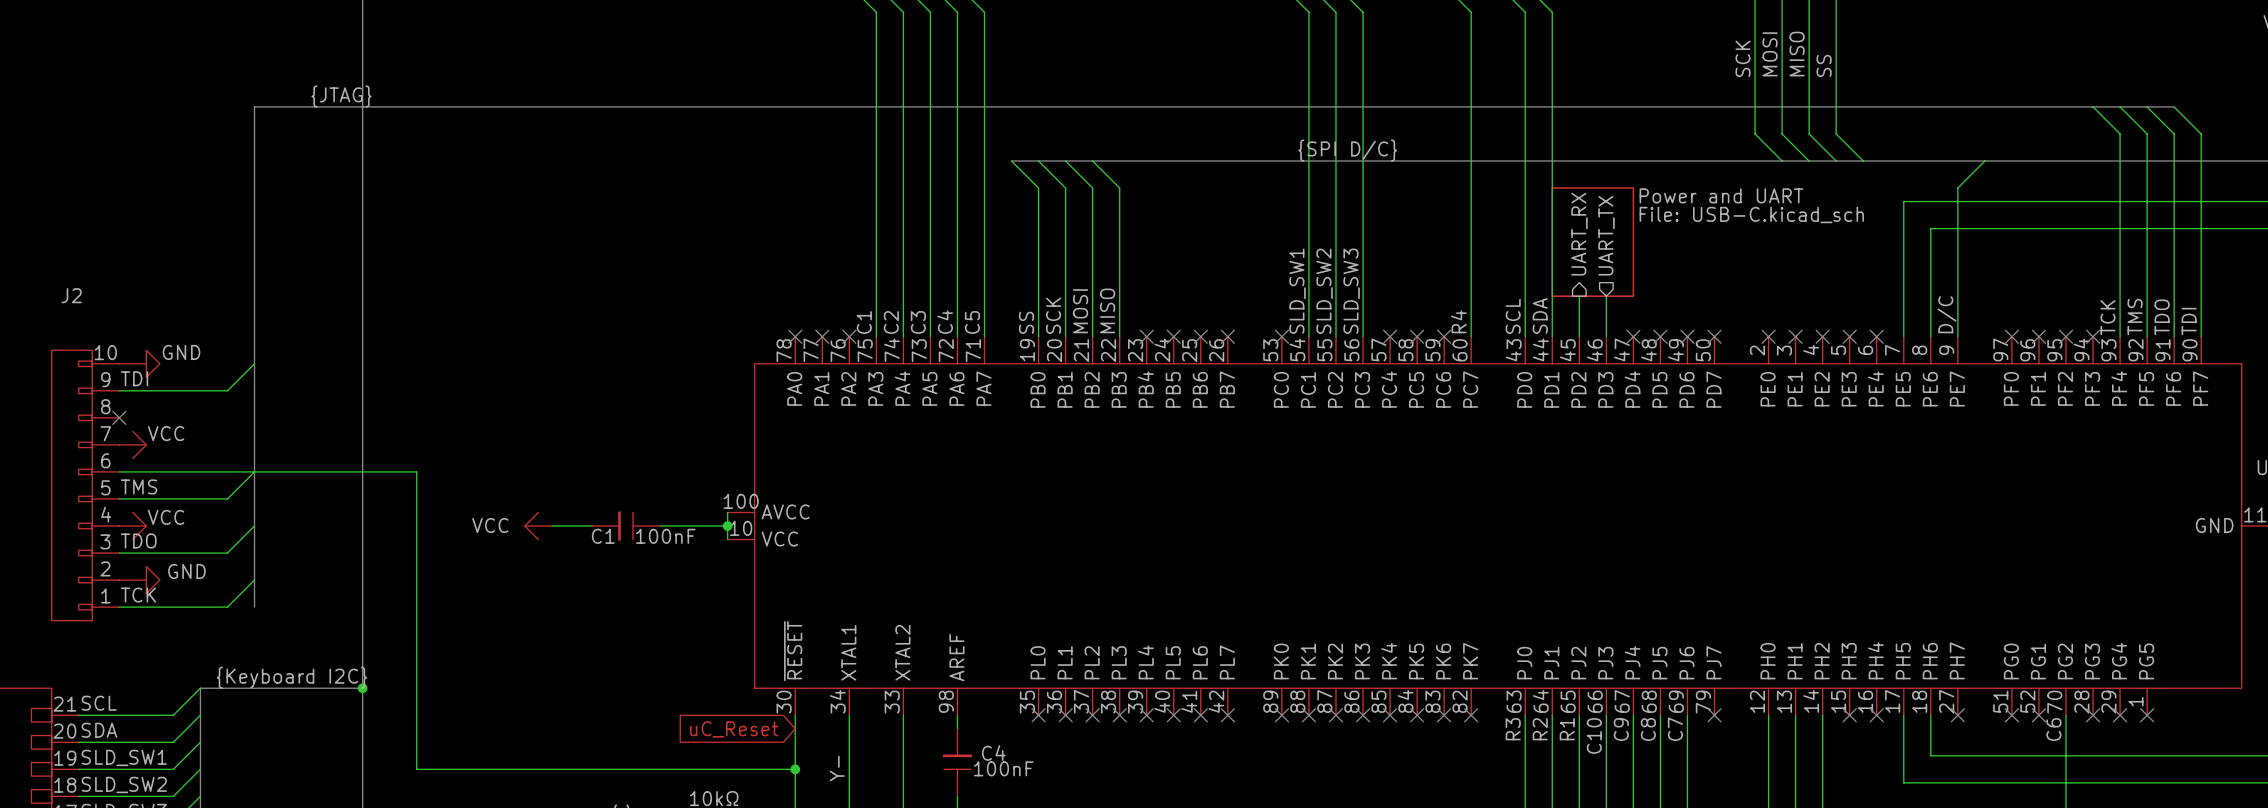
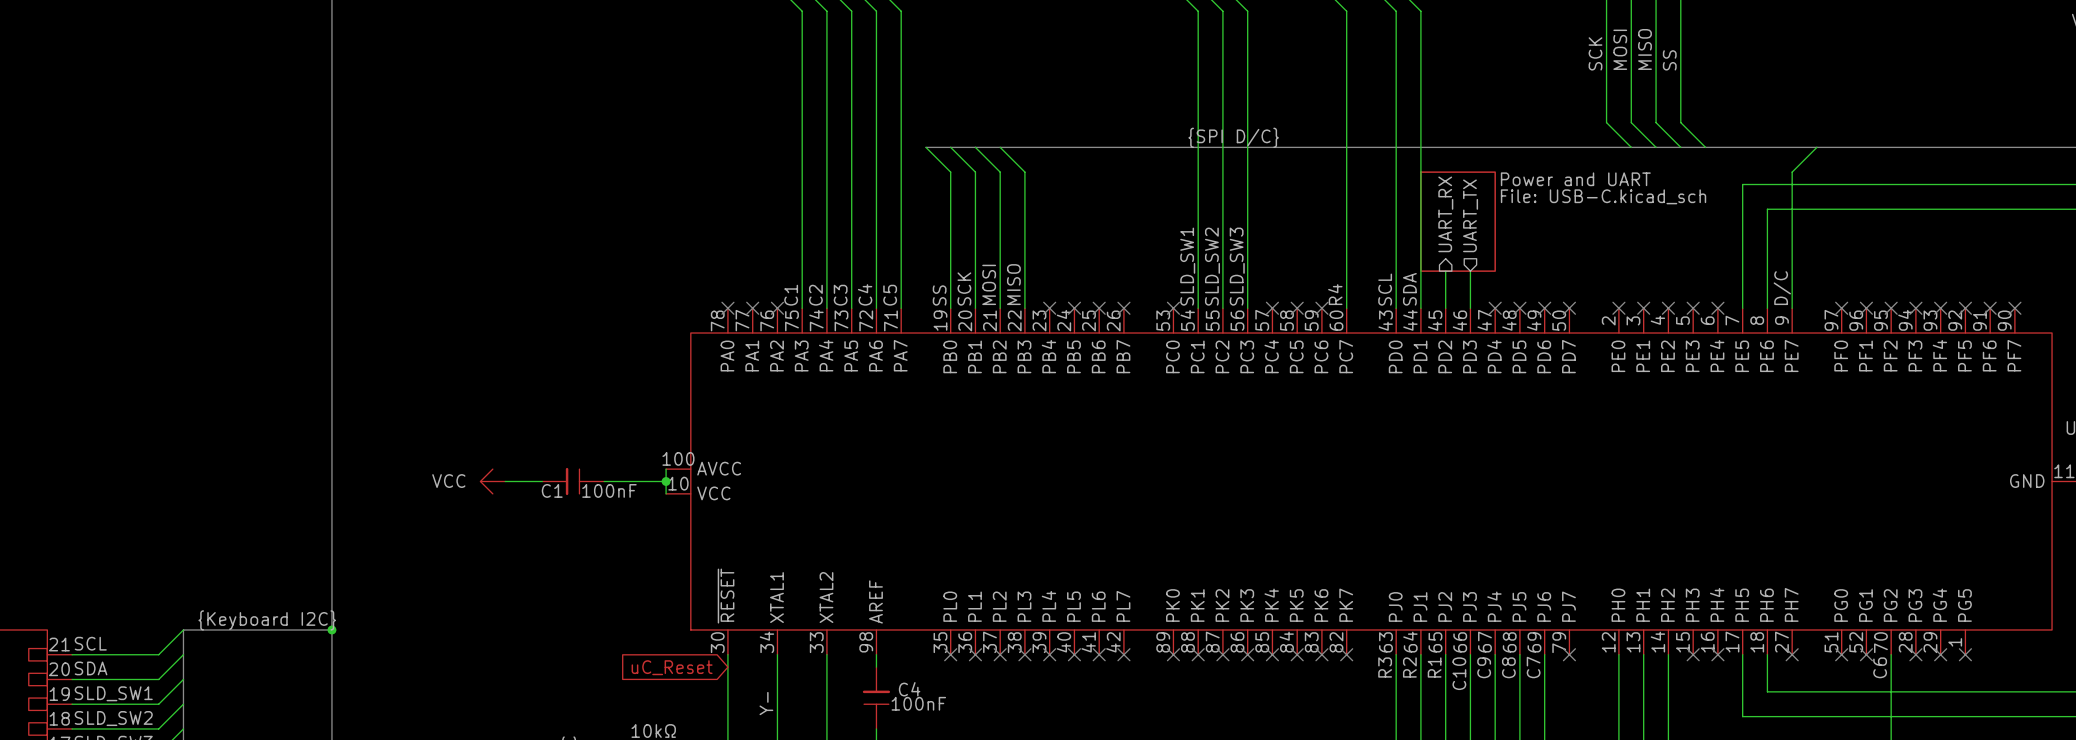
label: {JTAG} (341, 96) -> none
wire: (2093, 106) (2120, 133) (2120, 336) -> none
wire: (2120, 106) (2147, 133) (2147, 336) -> none
wire: (2147, 106) (2174, 133) (2174, 336) -> none
wire: (2174, 106) (2201, 133) (2201, 336) -> none
bus: (2174, 106) (254, 106) (254, 607) -> none
label: TCK (2108, 317) -> none
label: TMS (2135, 317) -> none
label: TDO (2162, 317) -> none
label: TDI (2189, 321) -> none
no-connect mark: none -> (1940, 308)
no-connect mark: none -> (1965, 308)
no-connect mark: none -> (1990, 308)
no-connect mark: none -> (2014, 308)
power symbol: GND (139, 363) -> none
wire: (254, 363) (227, 390) (119, 390) -> none
label: TDI (134, 378) -> none
no-connect mark: (119, 417) -> none
power symbol: VCC (132, 444) -> none
wire: (119, 471) (416, 471) (416, 769) (795, 769) -> none
wire: (254, 471) (227, 498) (119, 498) -> none
J2: (85, 485) -> none
label: TMS (139, 486) -> none
power symbol: VCC (132, 526) -> none
wire: (254, 526) (227, 553) (119, 553) -> none
label: TDO (138, 540) -> none
power symbol: GND (139, 580) -> none
wire: (254, 580) (227, 607) (119, 607) -> none
label: TCK (138, 595) -> none
junction: (795, 769) -> none

